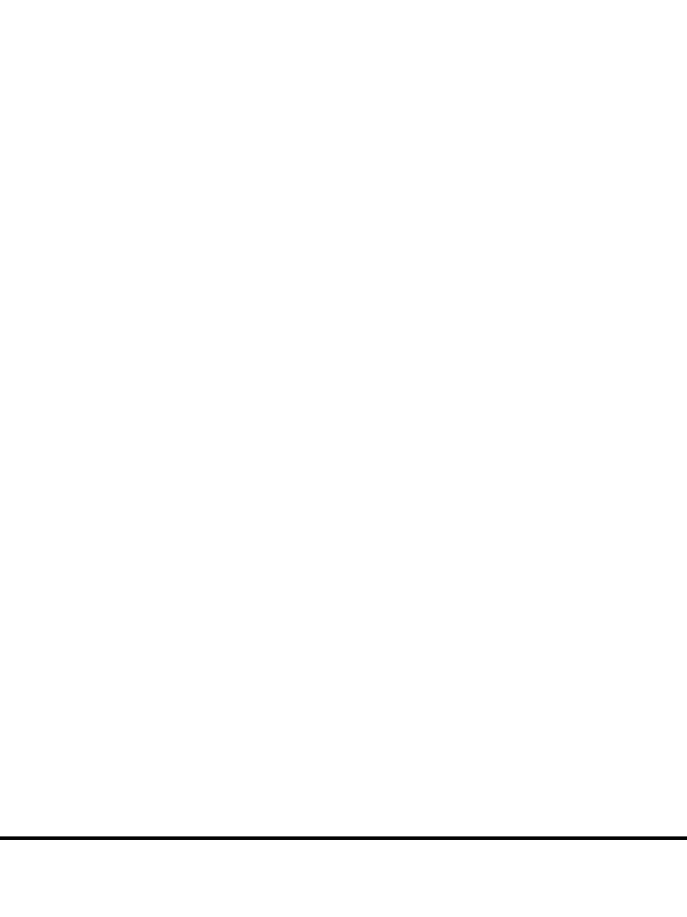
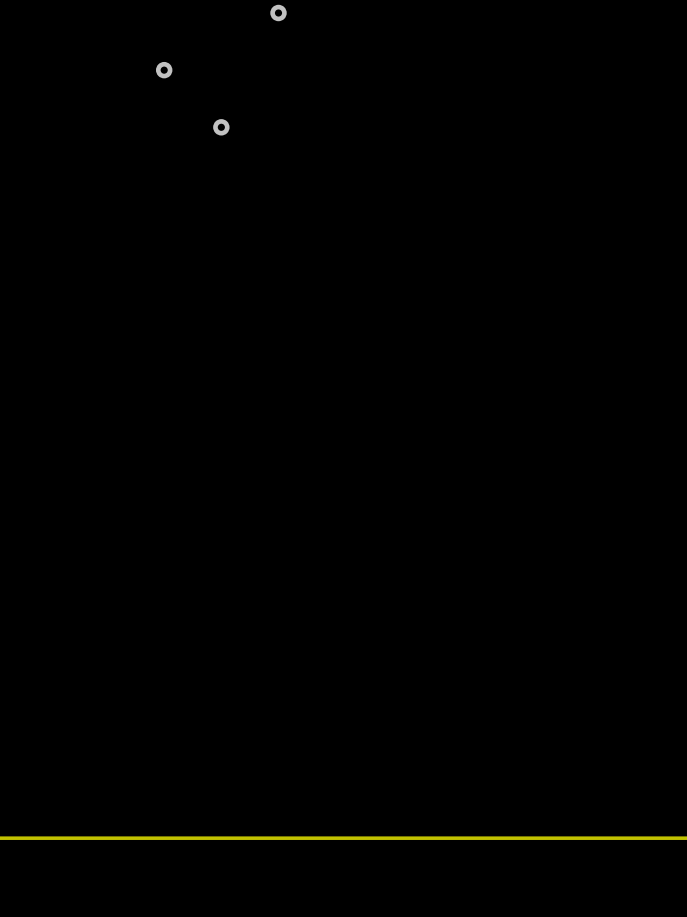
via: none -> (278, 12)
via: none -> (164, 70)
via: none -> (221, 127)

